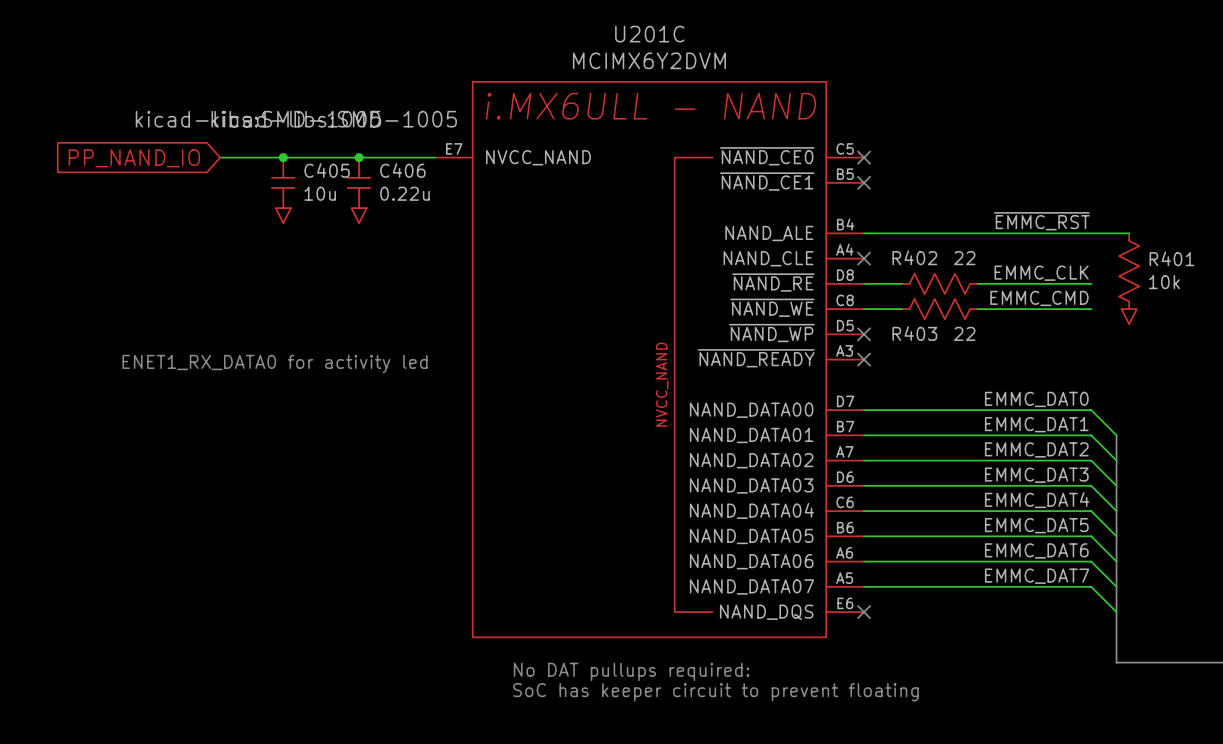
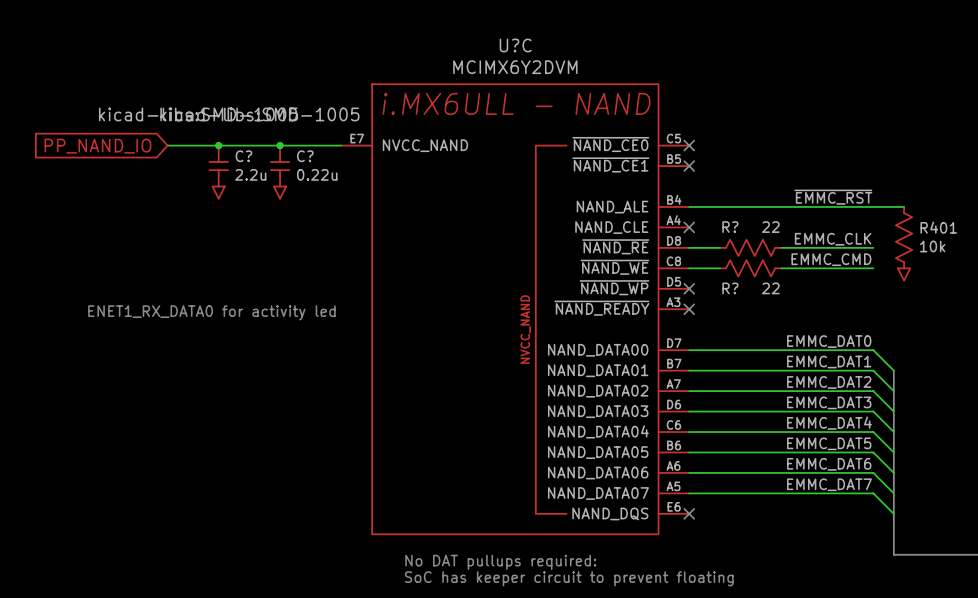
U201C name: U201C (649, 34) -> U?C (515, 45)
C405 name: C405 (327, 170) -> C? (243, 156)
C406 name: C406 (402, 170) -> C? (305, 156)
C405 value: 10u (320, 193) -> 2.2u (250, 174)
R402 name: R402 (914, 257) -> R? (730, 227)
R403 name: R403 (914, 333) -> R? (730, 288)

